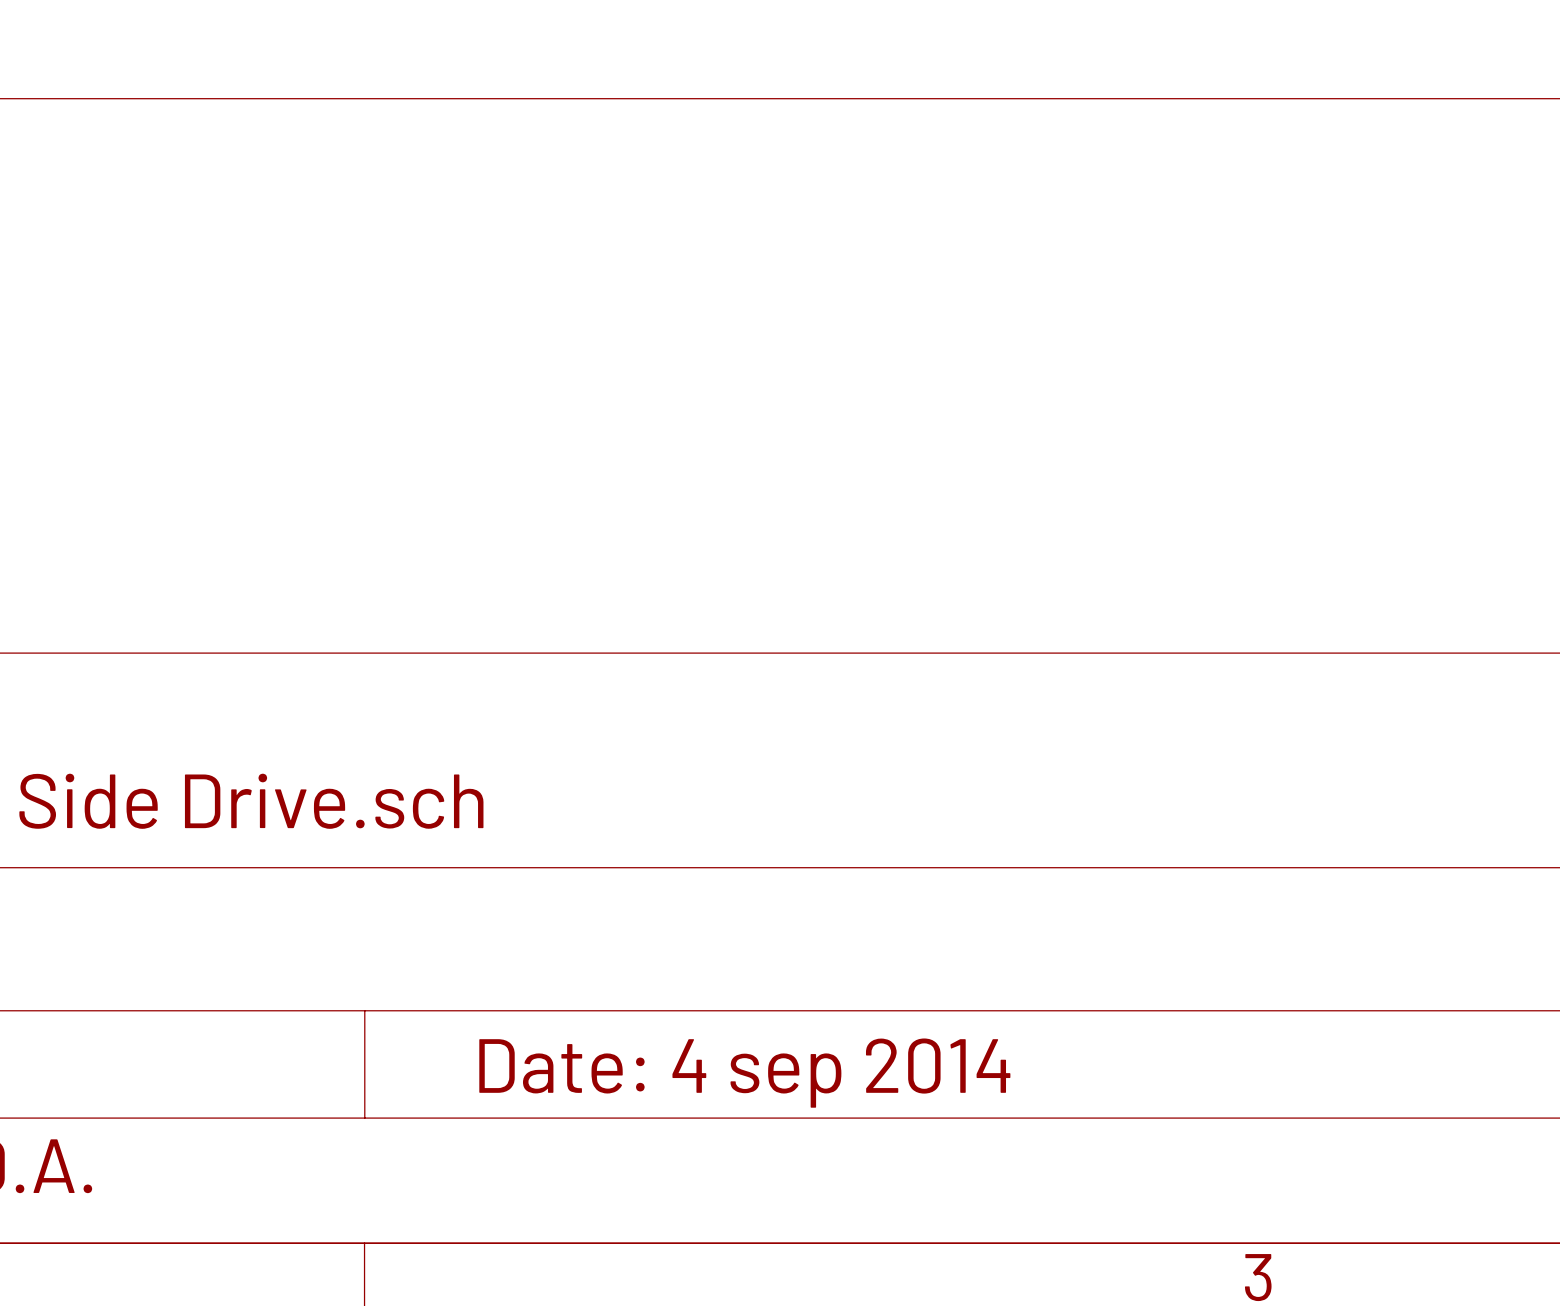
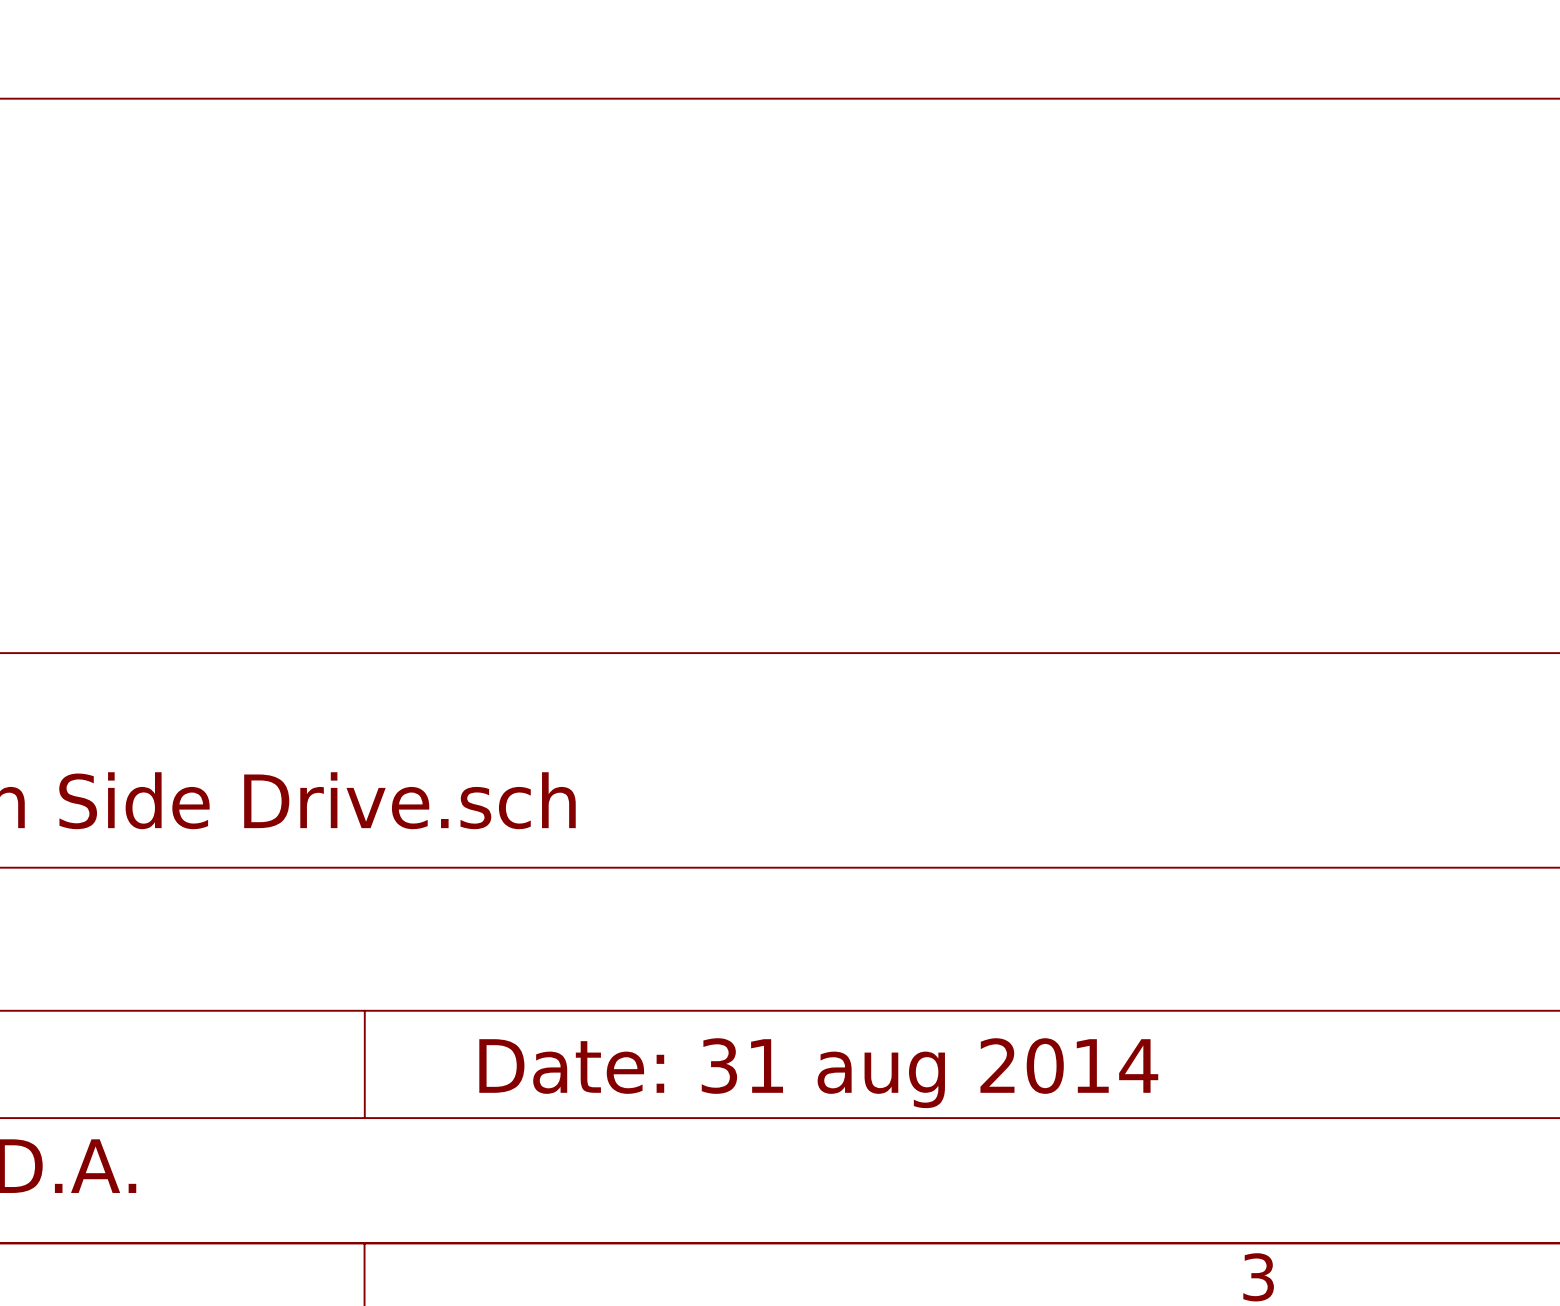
title block: Date: 4 sep 2014 (744, 1073) -> Date: 31 aug 2014 (818, 1073)

